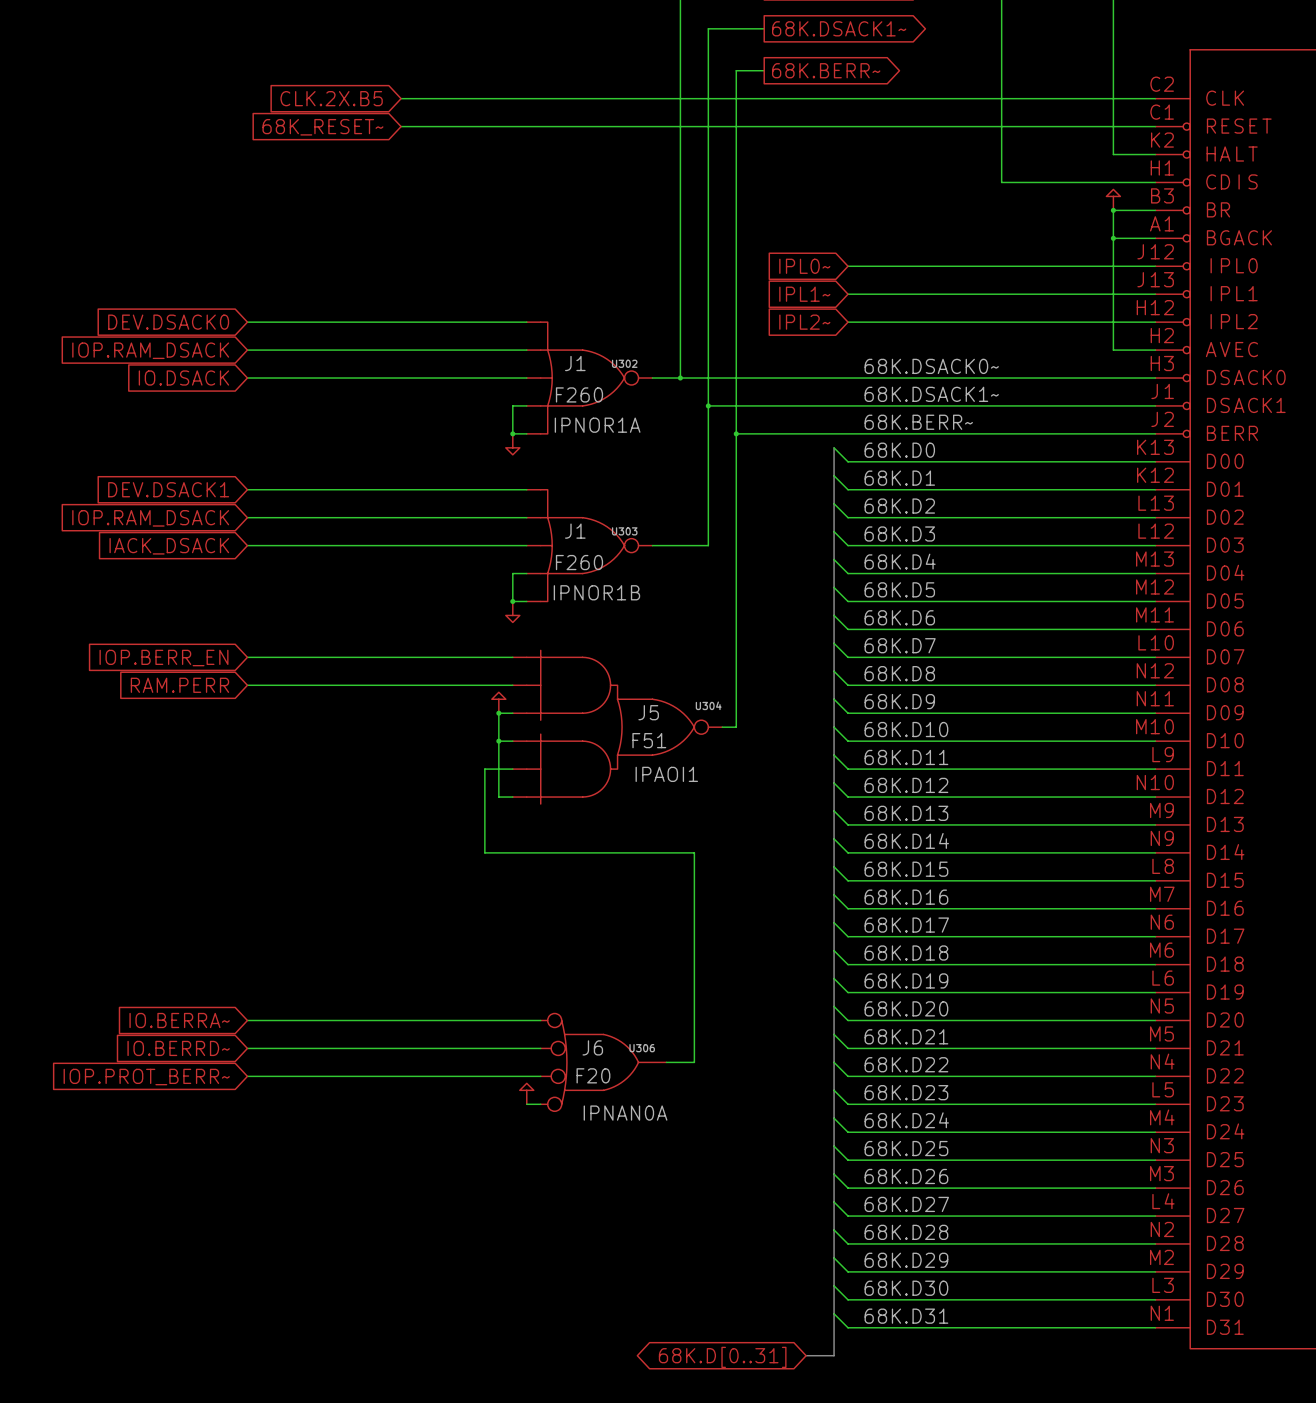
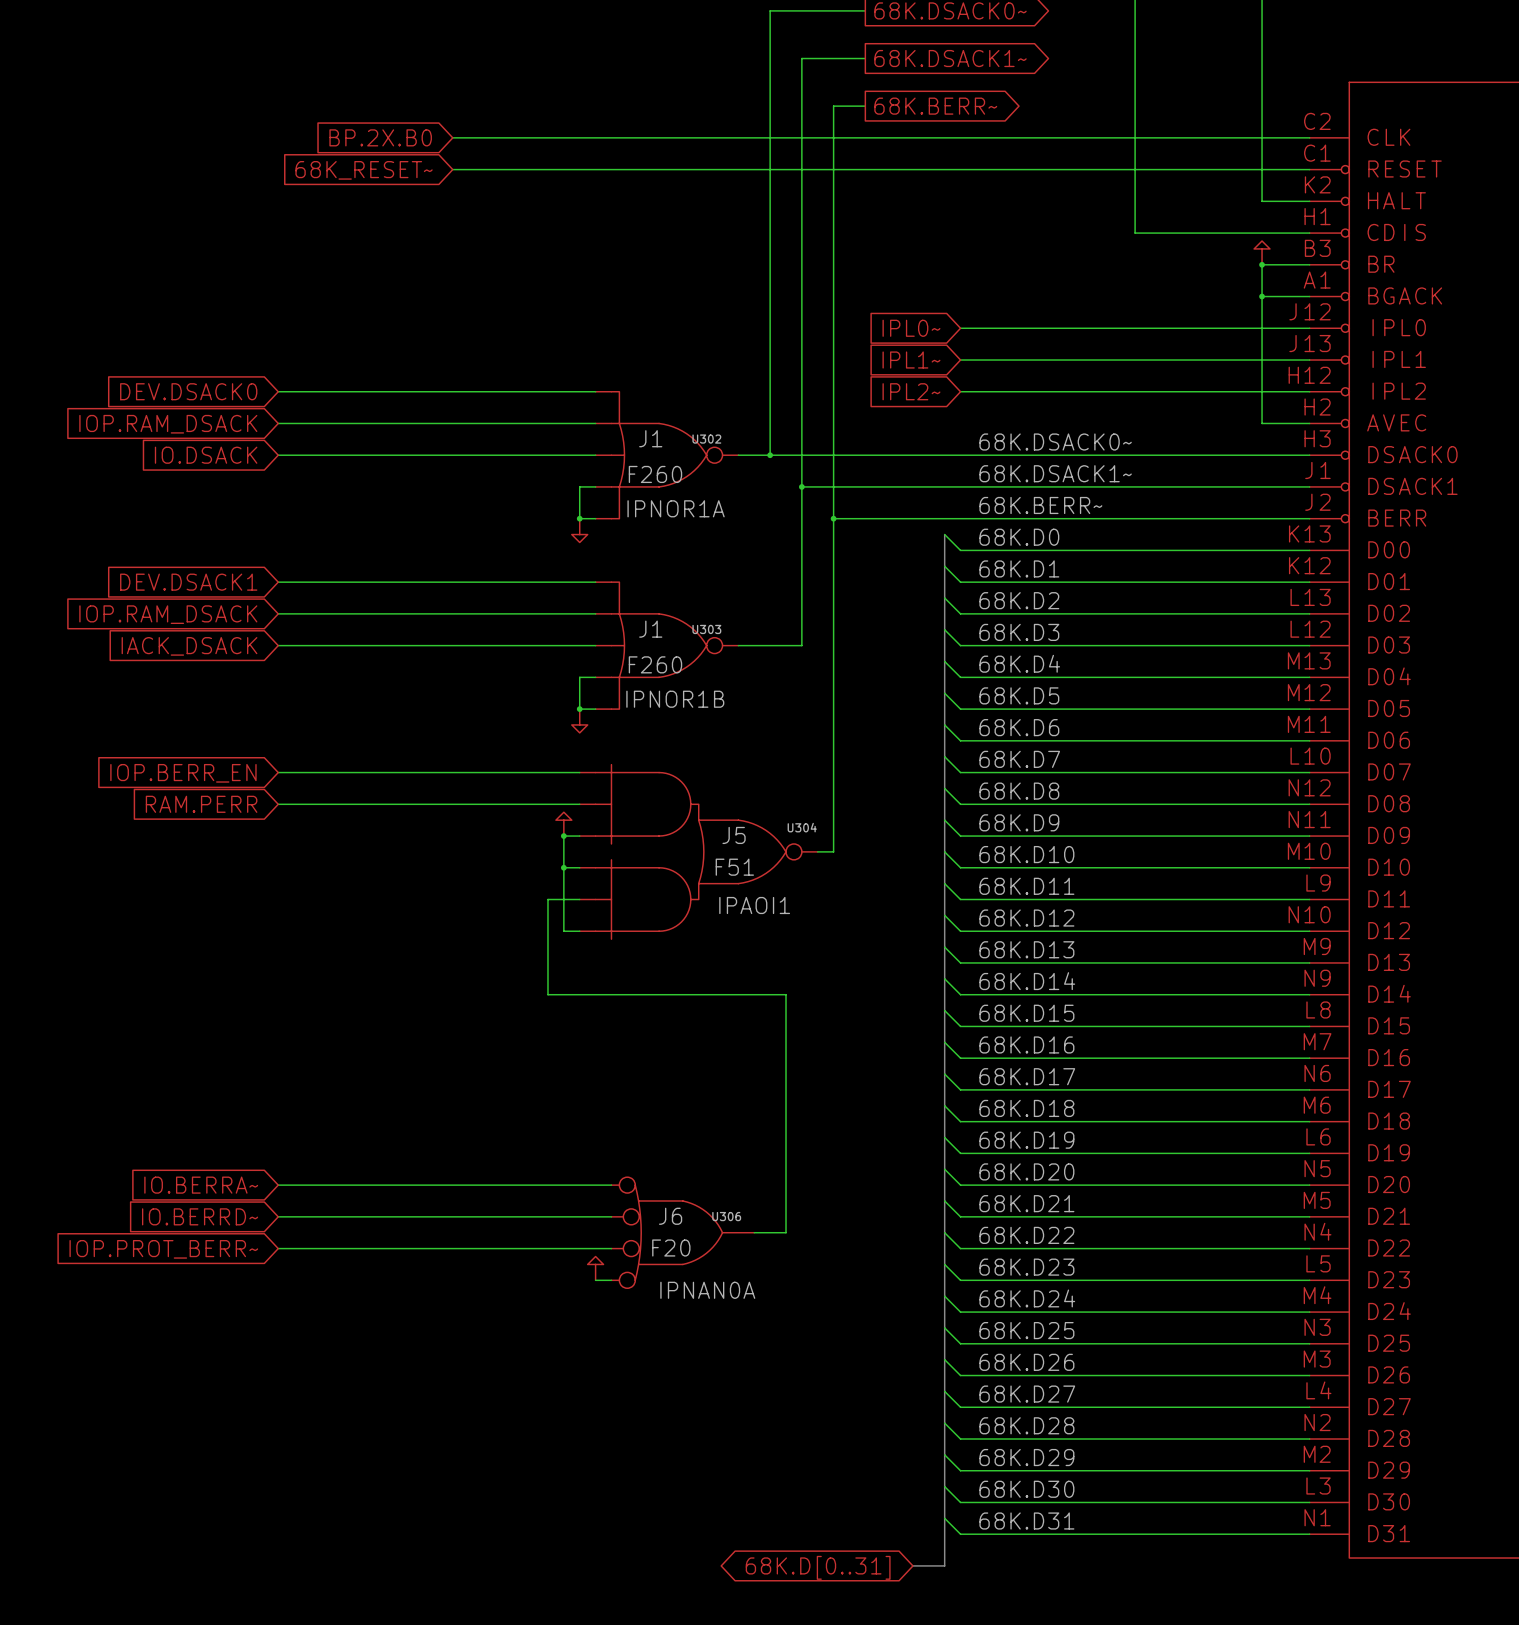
global label: CLK.2X.B5 (331, 98) -> BP.2X.B0 (380, 137)

